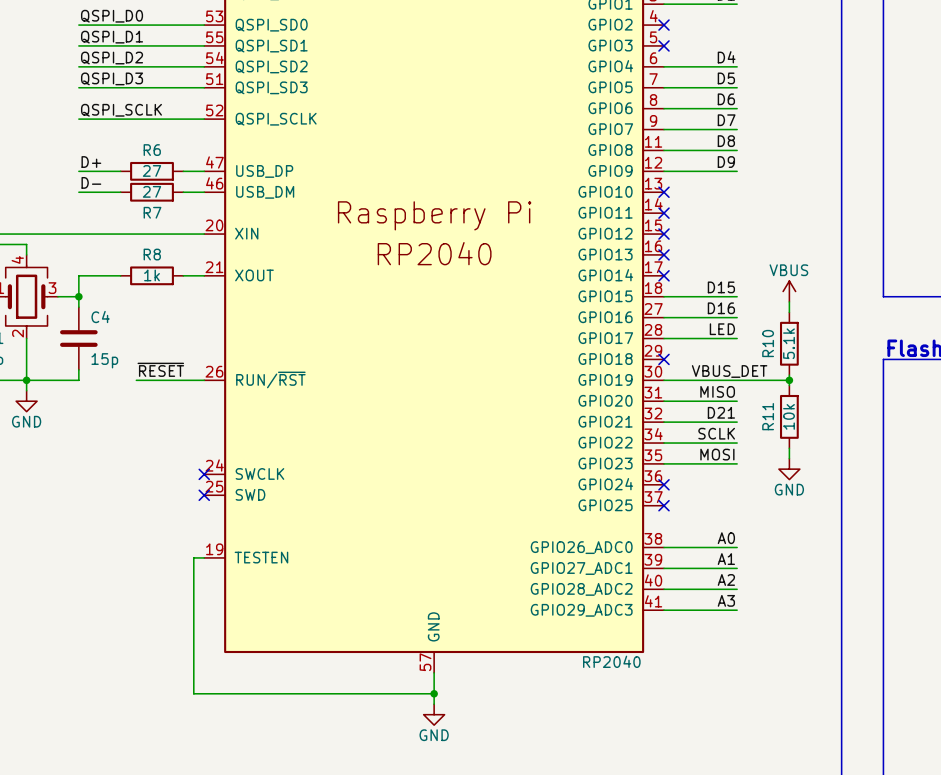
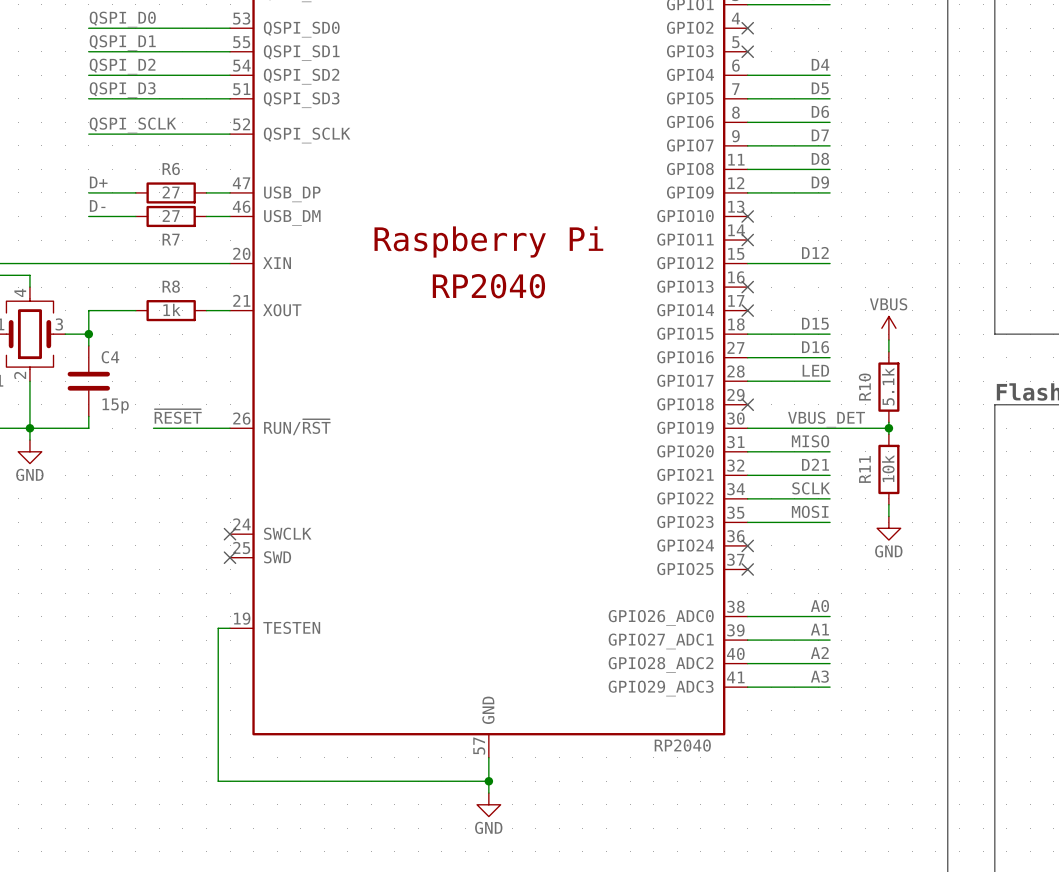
label: none -> D12 (815, 252)
wire: none -> (747, 263) (830, 263)
no-connect mark: (664, 234) -> none

